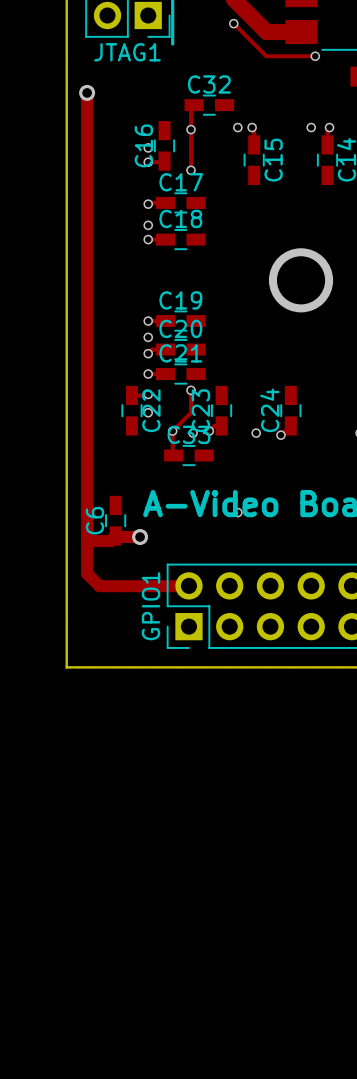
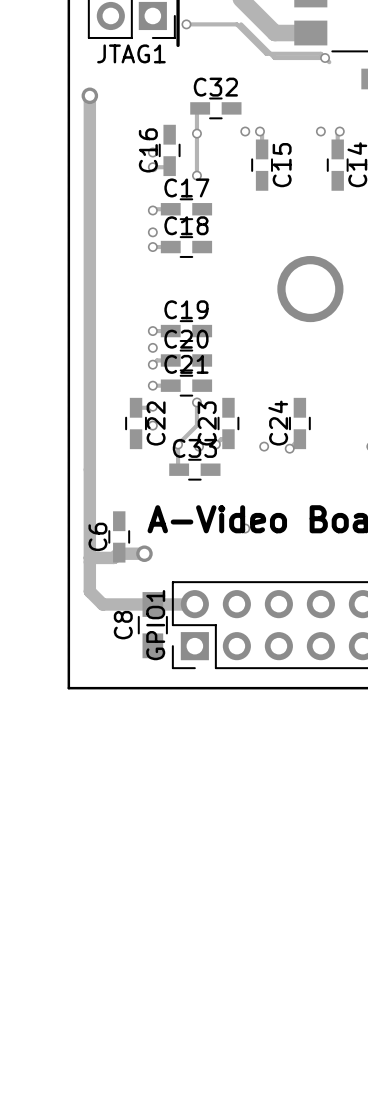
track: none -> (186, 24) (236, 24) (266, 53) (320, 53) (329, 62)
via position: (233, 23) -> (186, 24)
C8: none -> (152, 625)

